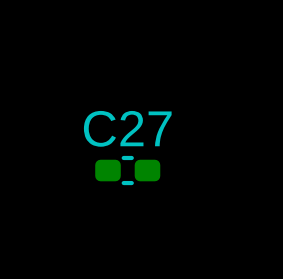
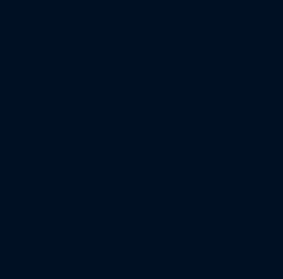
C27: (127, 170) -> none

